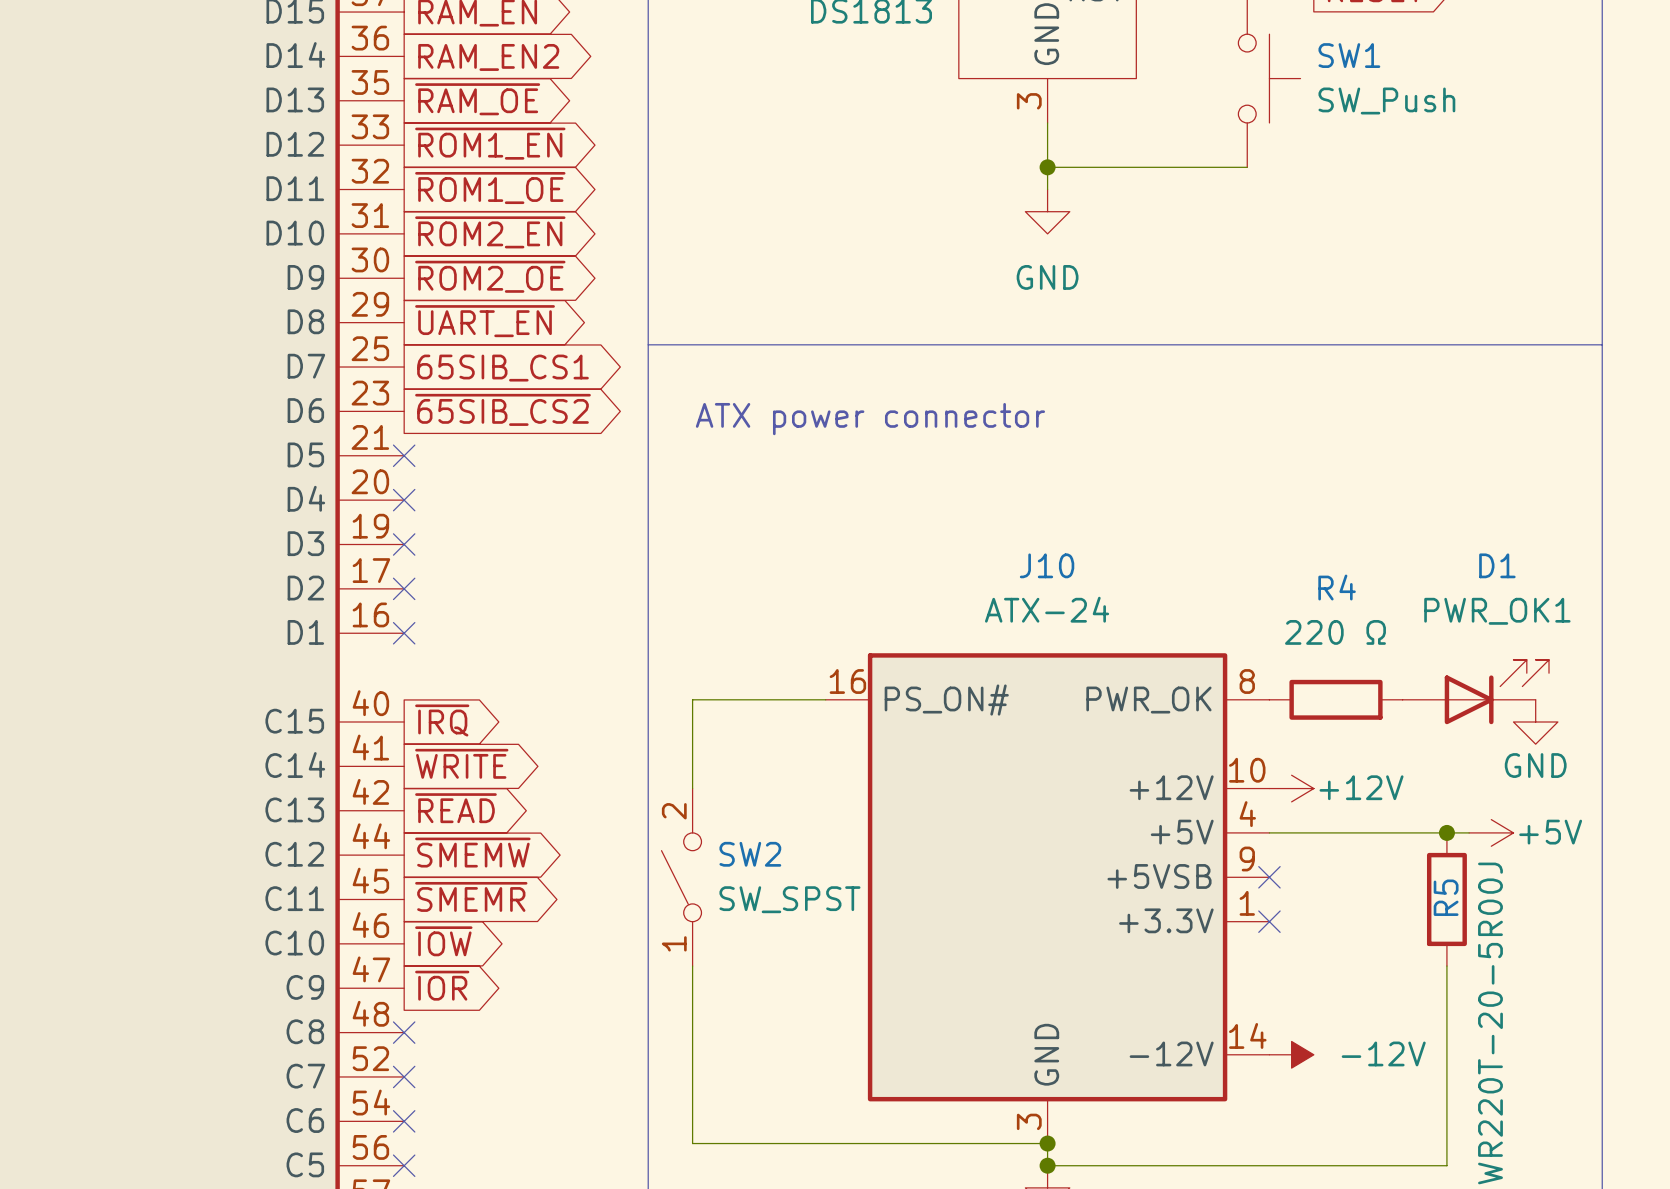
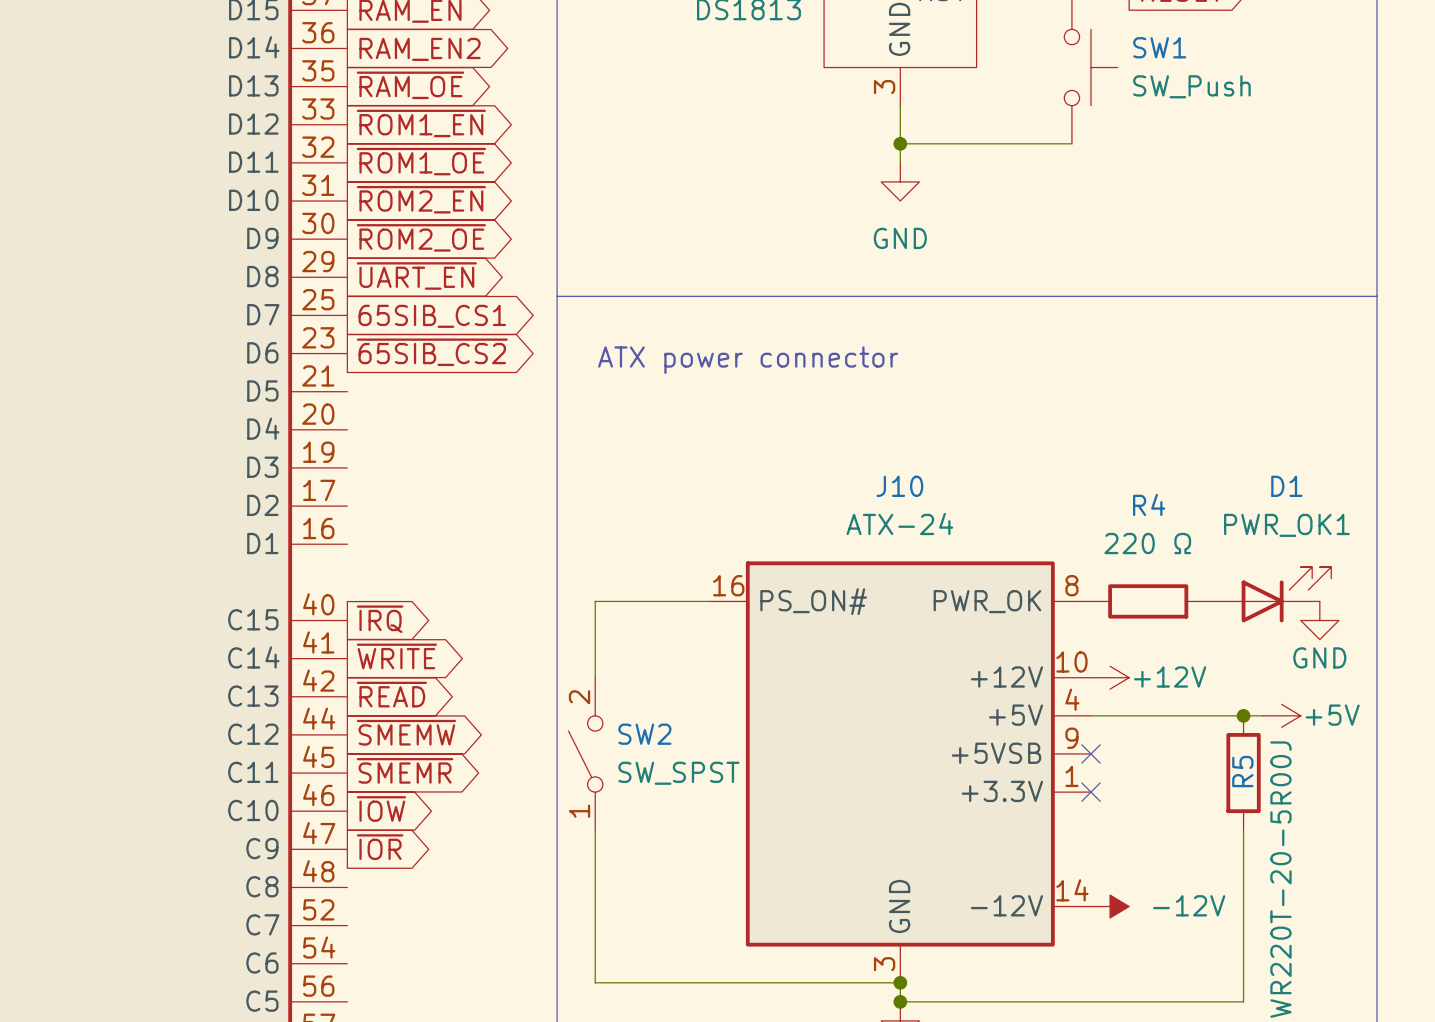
no-connect mark: (404, 455) -> none
no-connect mark: (404, 500) -> none
no-connect mark: (404, 544) -> none
no-connect mark: (404, 588) -> none
no-connect mark: (404, 633) -> none
no-connect mark: (404, 1032) -> none
no-connect mark: (404, 1076) -> none
no-connect mark: (404, 1121) -> none
no-connect mark: (404, 1165) -> none

